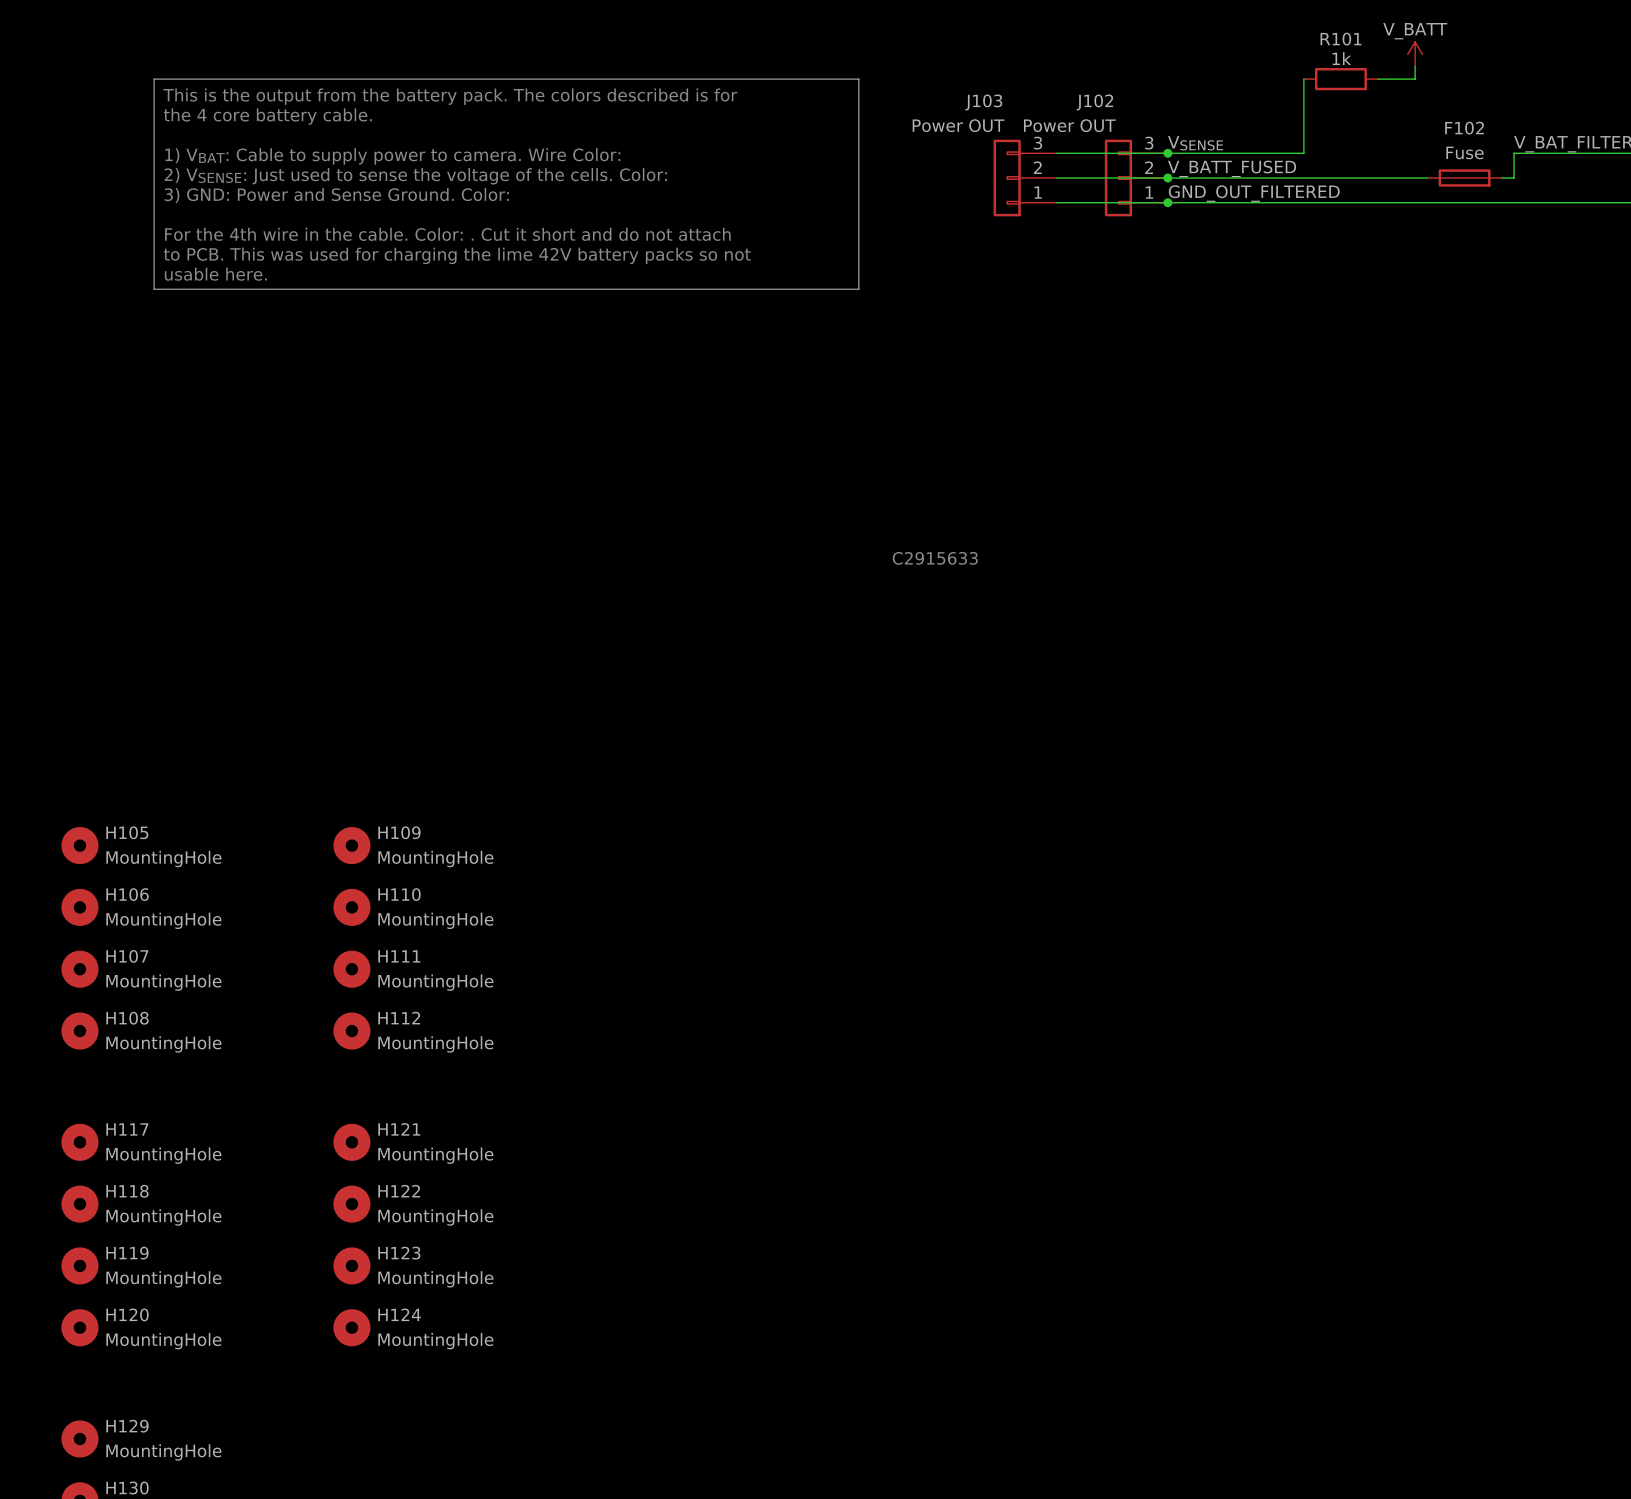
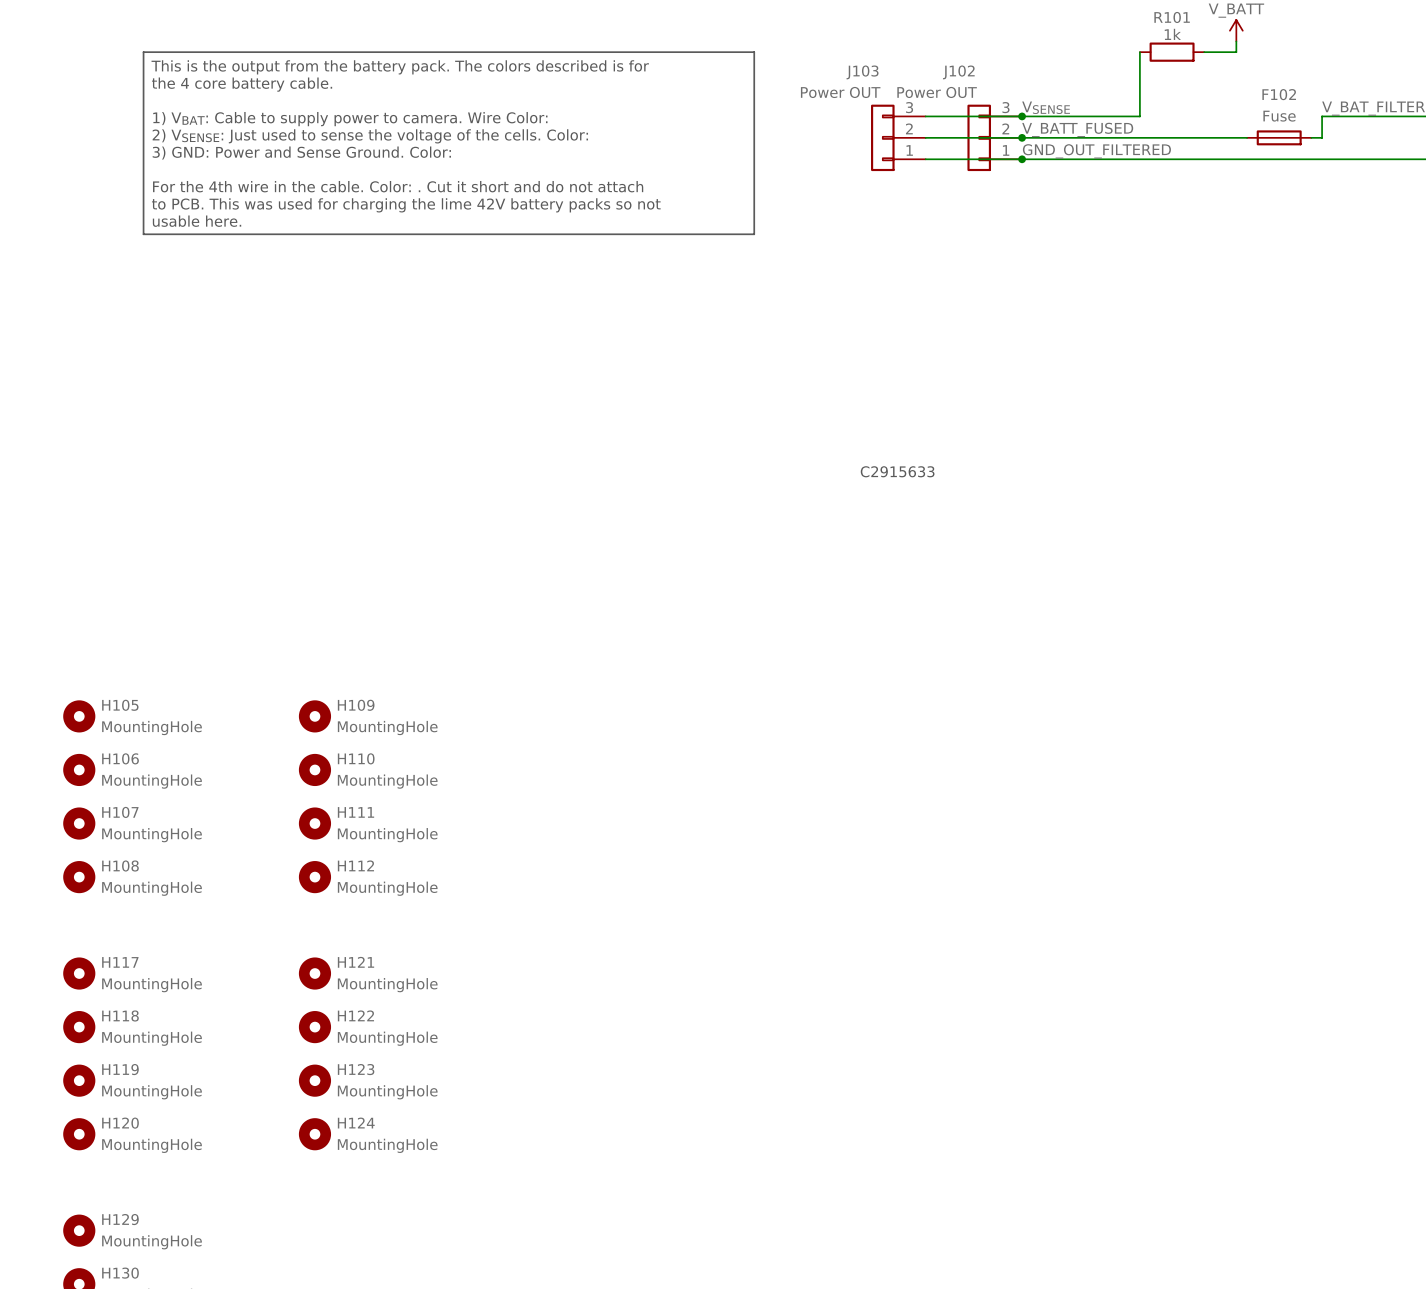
text position: C2915633 (935, 558) -> C2915633 (897, 471)

